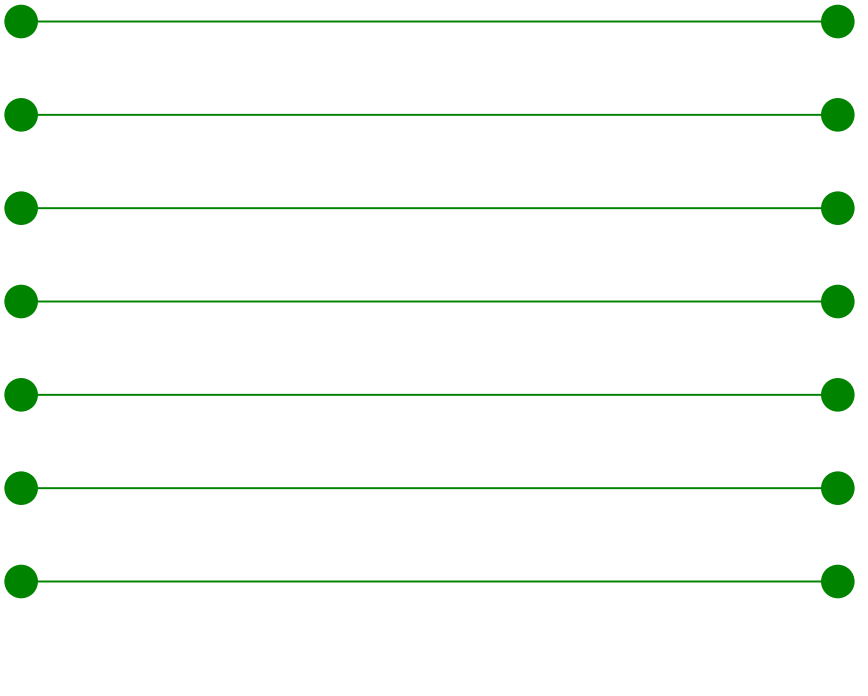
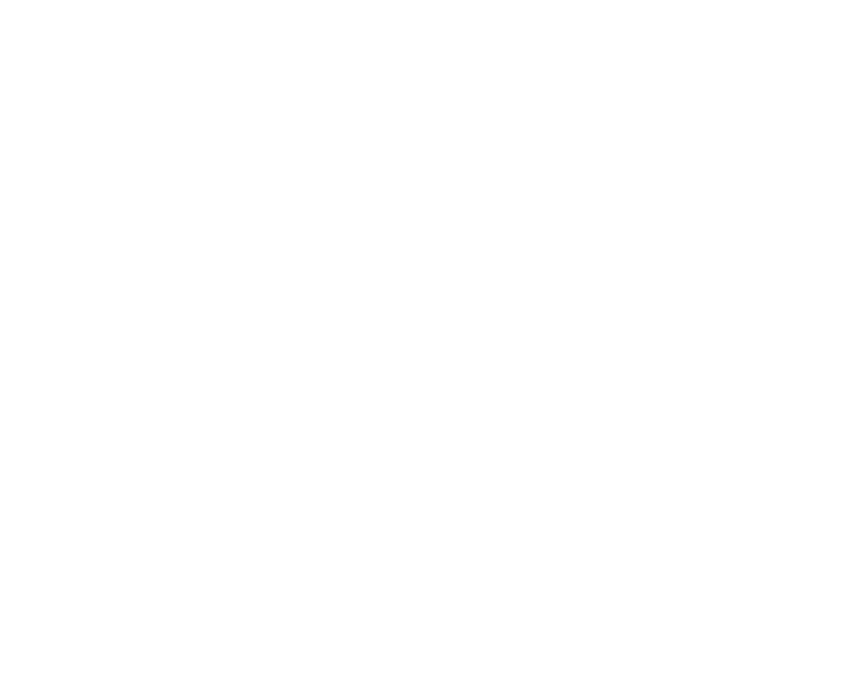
wire: (21, 21) (837, 21) -> none
junction: (21, 21) -> none
junction: (837, 21) -> none
wire: (21, 114) (837, 114) -> none
junction: (21, 114) -> none
junction: (837, 114) -> none
wire: (21, 208) (837, 208) -> none
junction: (21, 208) -> none
junction: (837, 208) -> none
wire: (21, 301) (837, 301) -> none
junction: (21, 301) -> none
junction: (837, 301) -> none
wire: (21, 394) (837, 394) -> none
junction: (21, 394) -> none
junction: (837, 394) -> none
wire: (21, 488) (837, 488) -> none
junction: (21, 488) -> none
junction: (837, 488) -> none
wire: (21, 581) (837, 581) -> none
junction: (21, 581) -> none
junction: (837, 581) -> none

